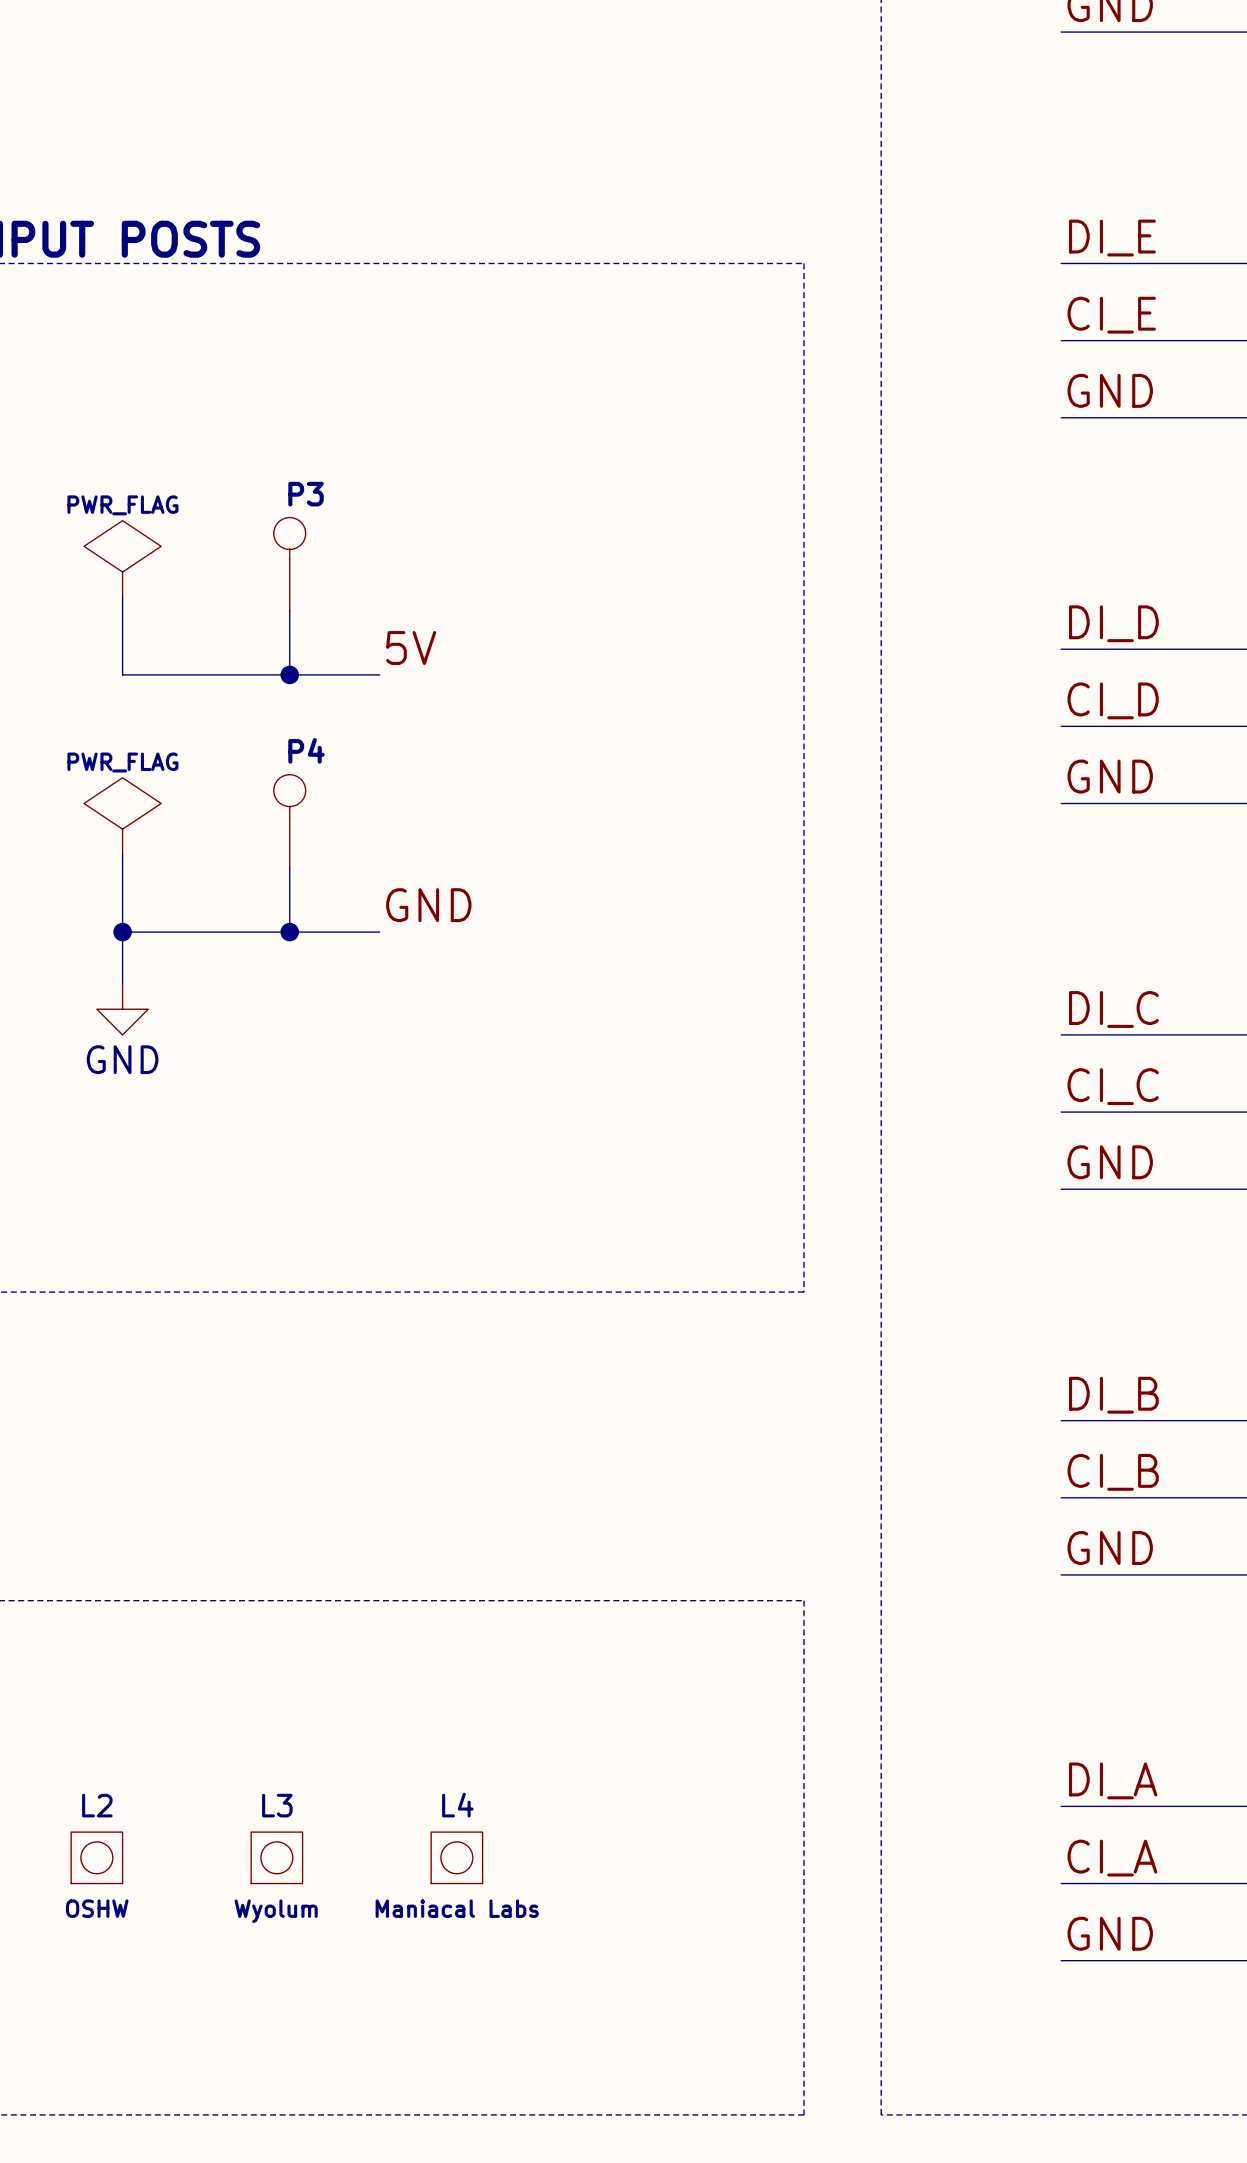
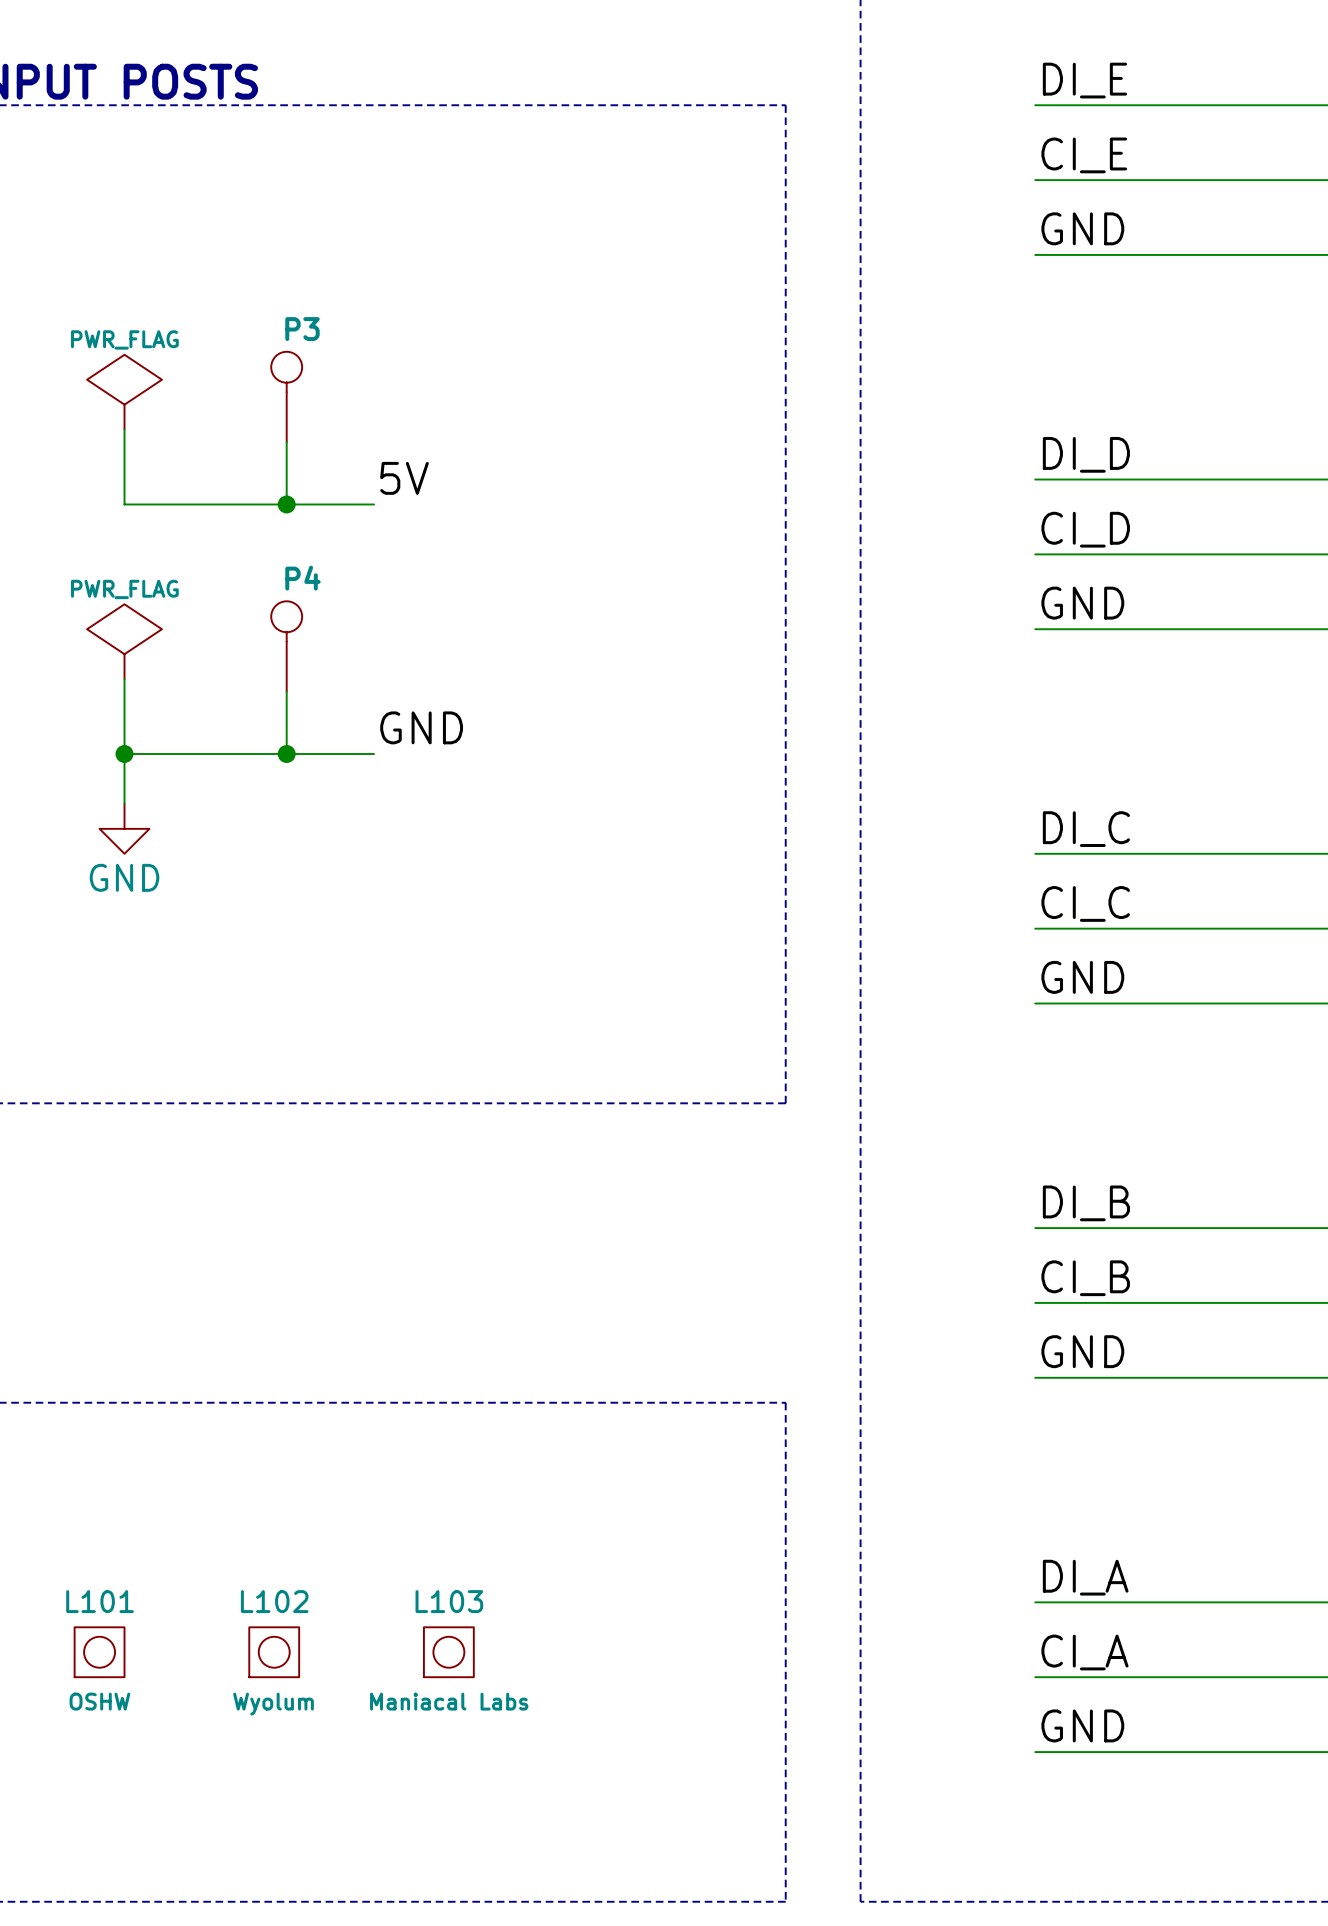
L2 name: L2 (97, 1805) -> L101 (100, 1601)
L3 name: L3 (277, 1805) -> L102 (274, 1601)
L4 name: L4 (457, 1805) -> L103 (449, 1601)

